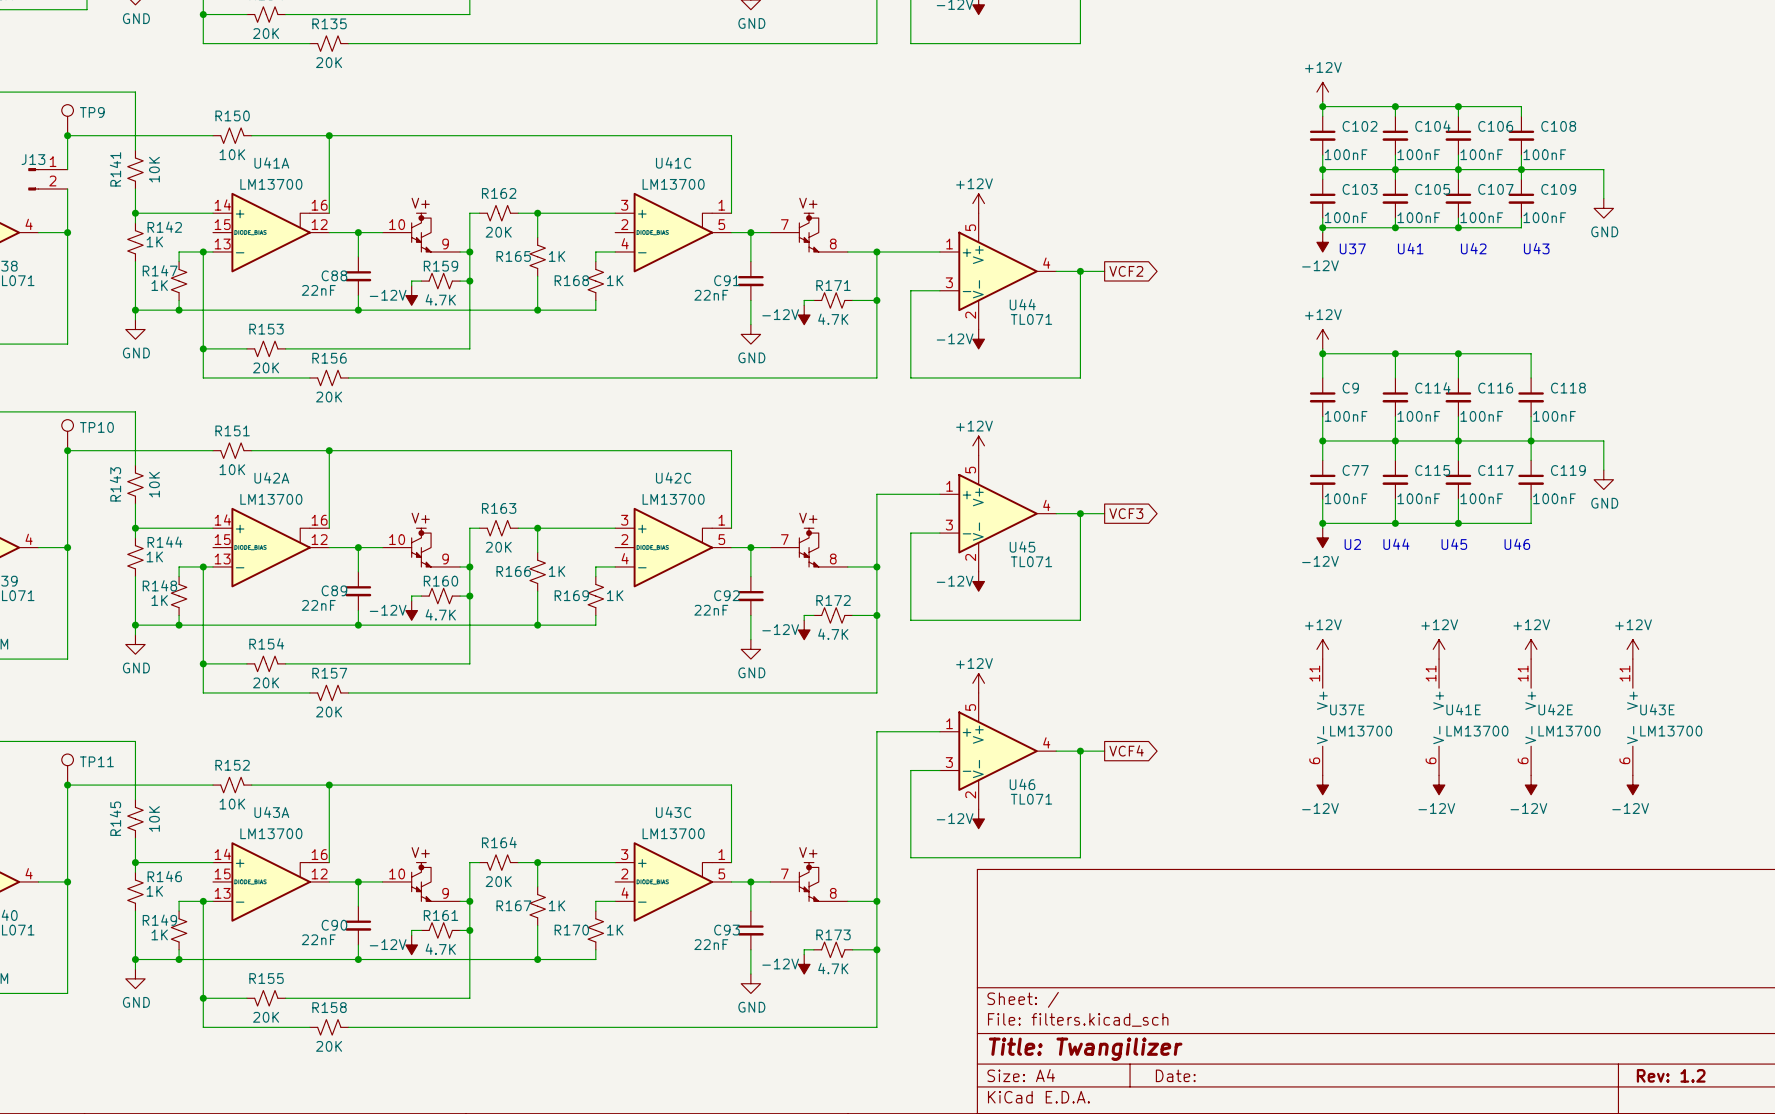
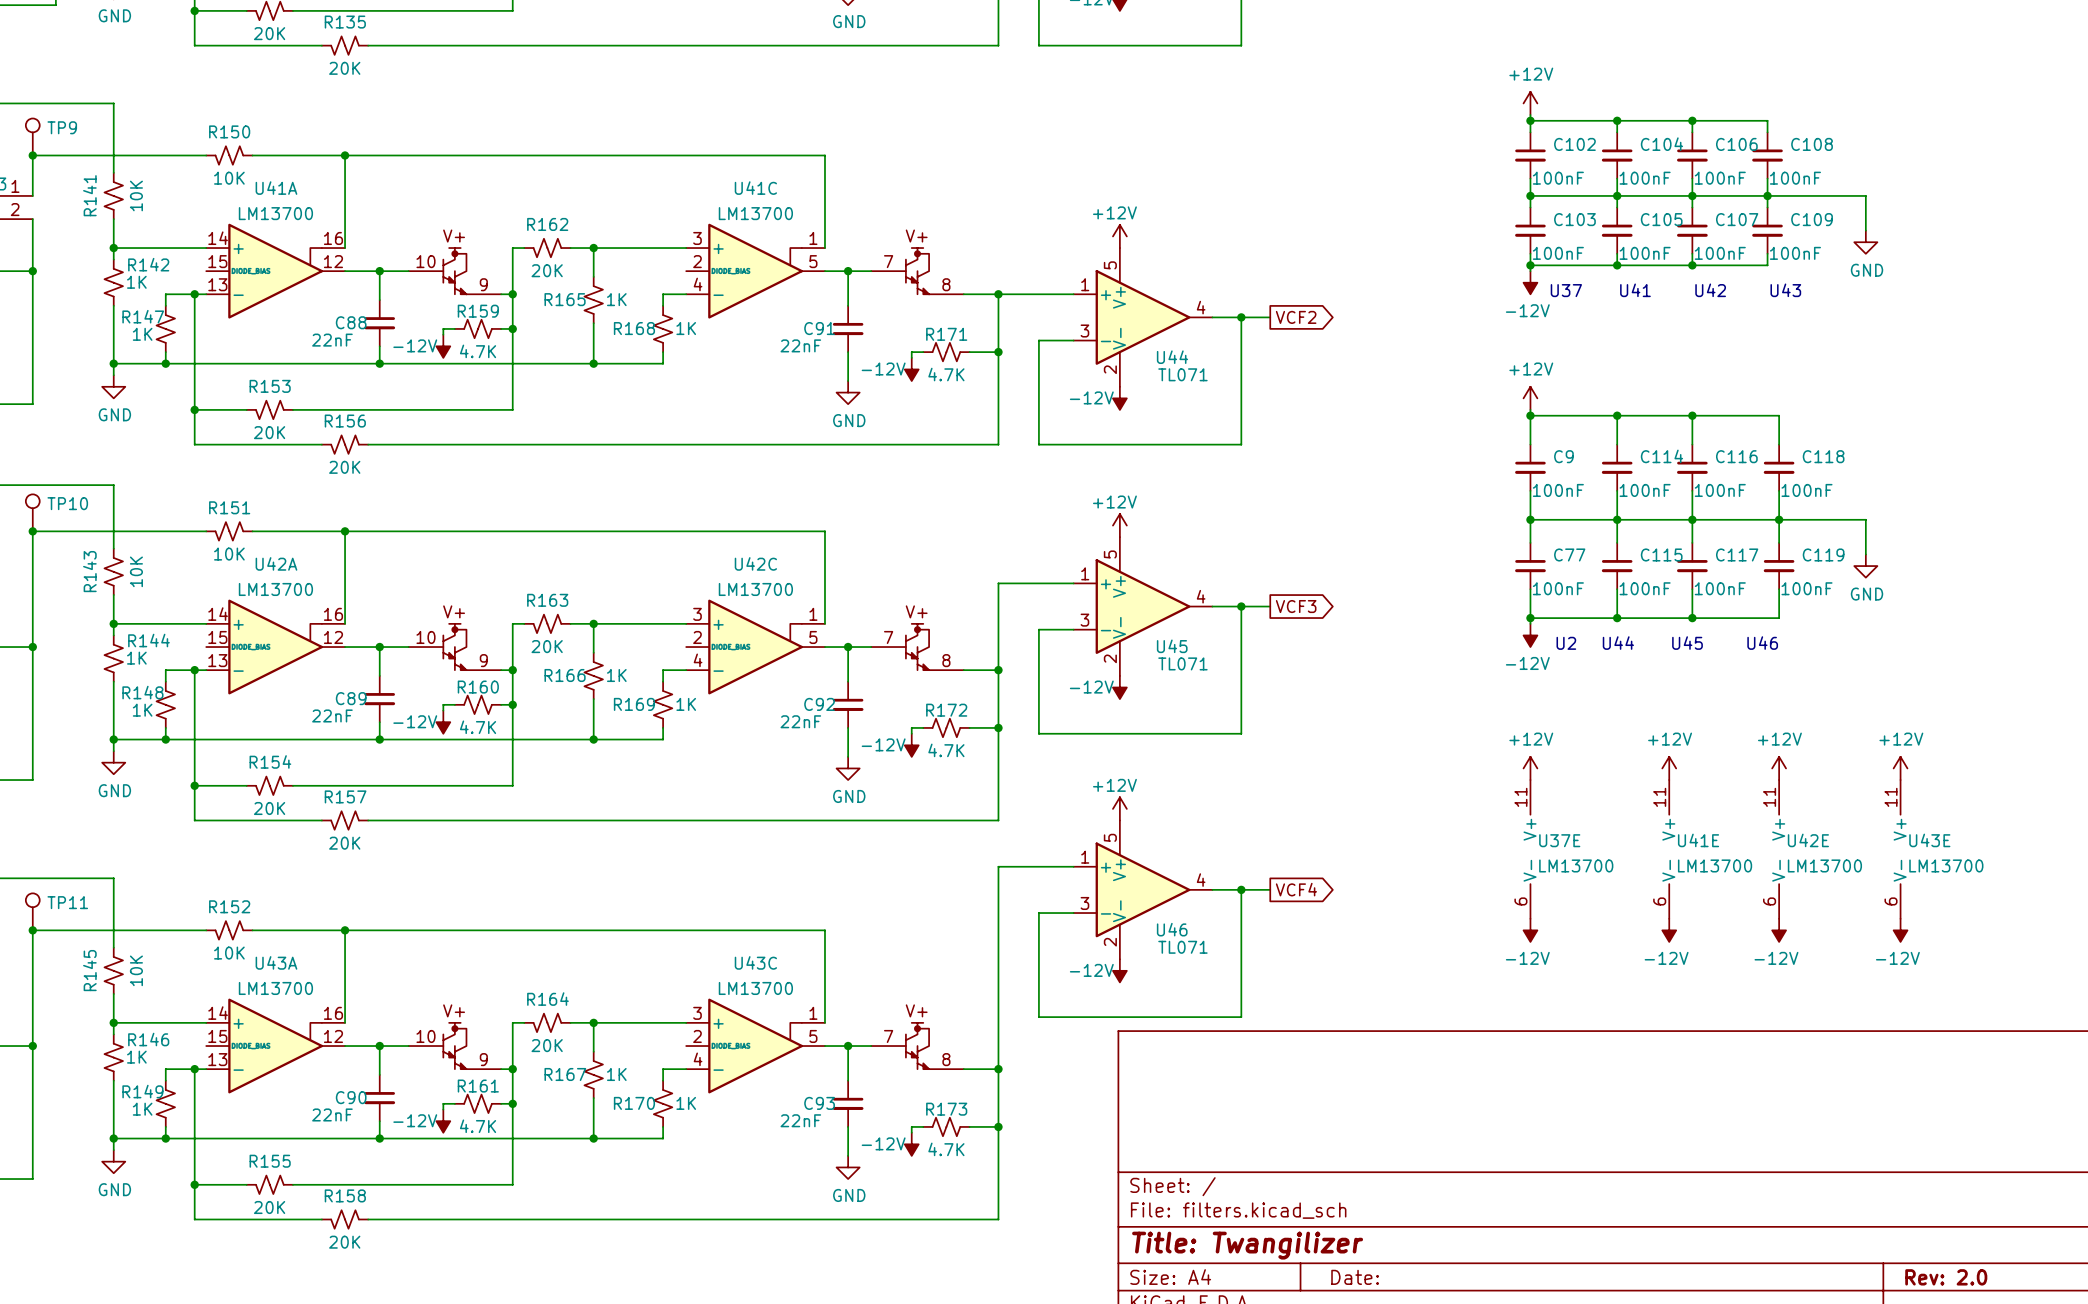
title block: Rev: 1.2 (1671, 1075) -> Rev: 2.0 (1946, 1277)

